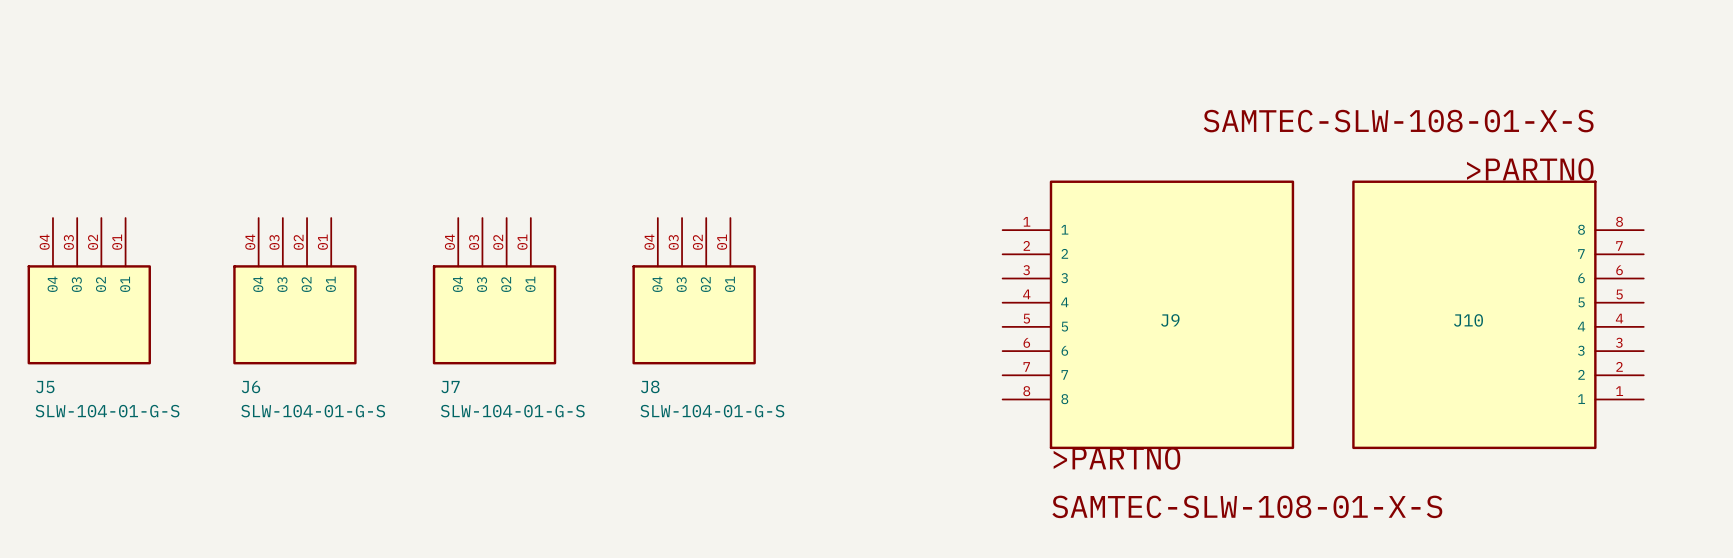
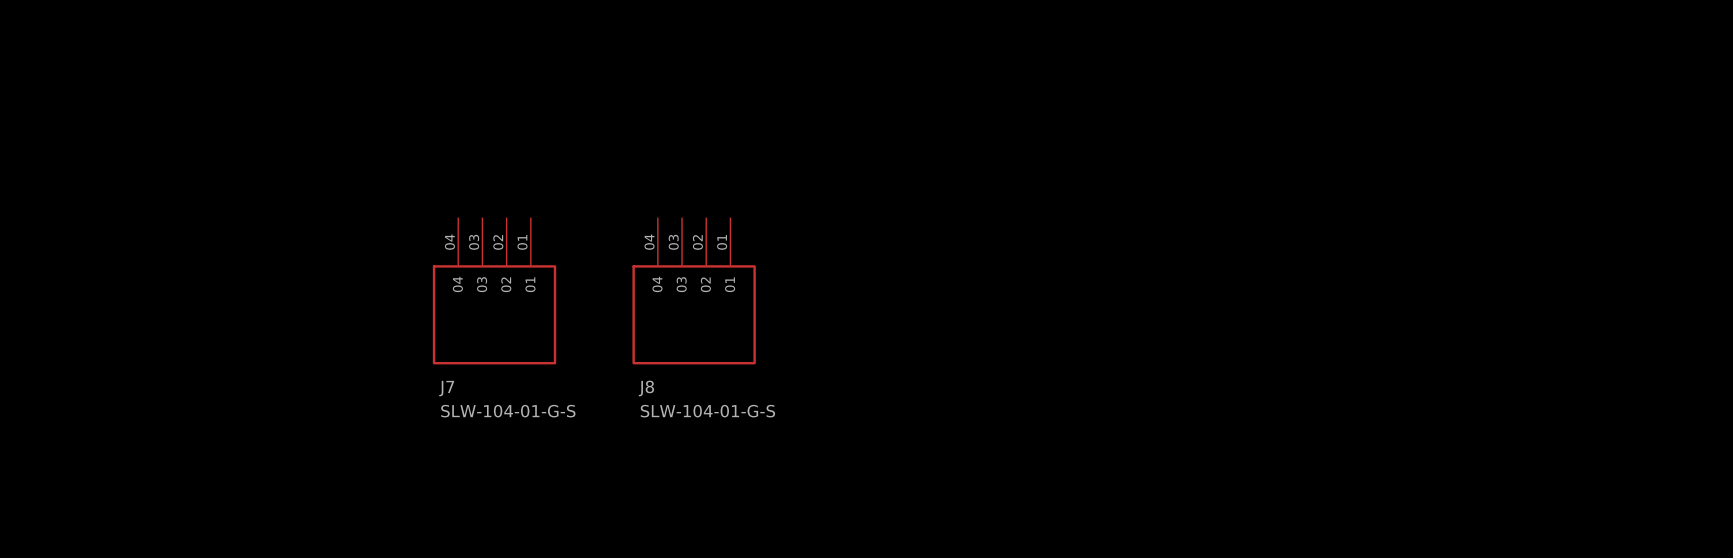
J5: SLW-104-01-G-S (89, 291) -> none
J6: SLW-104-01-G-S (294, 291) -> none
J9: (1148, 314) -> none
J10: (1497, 314) -> none

